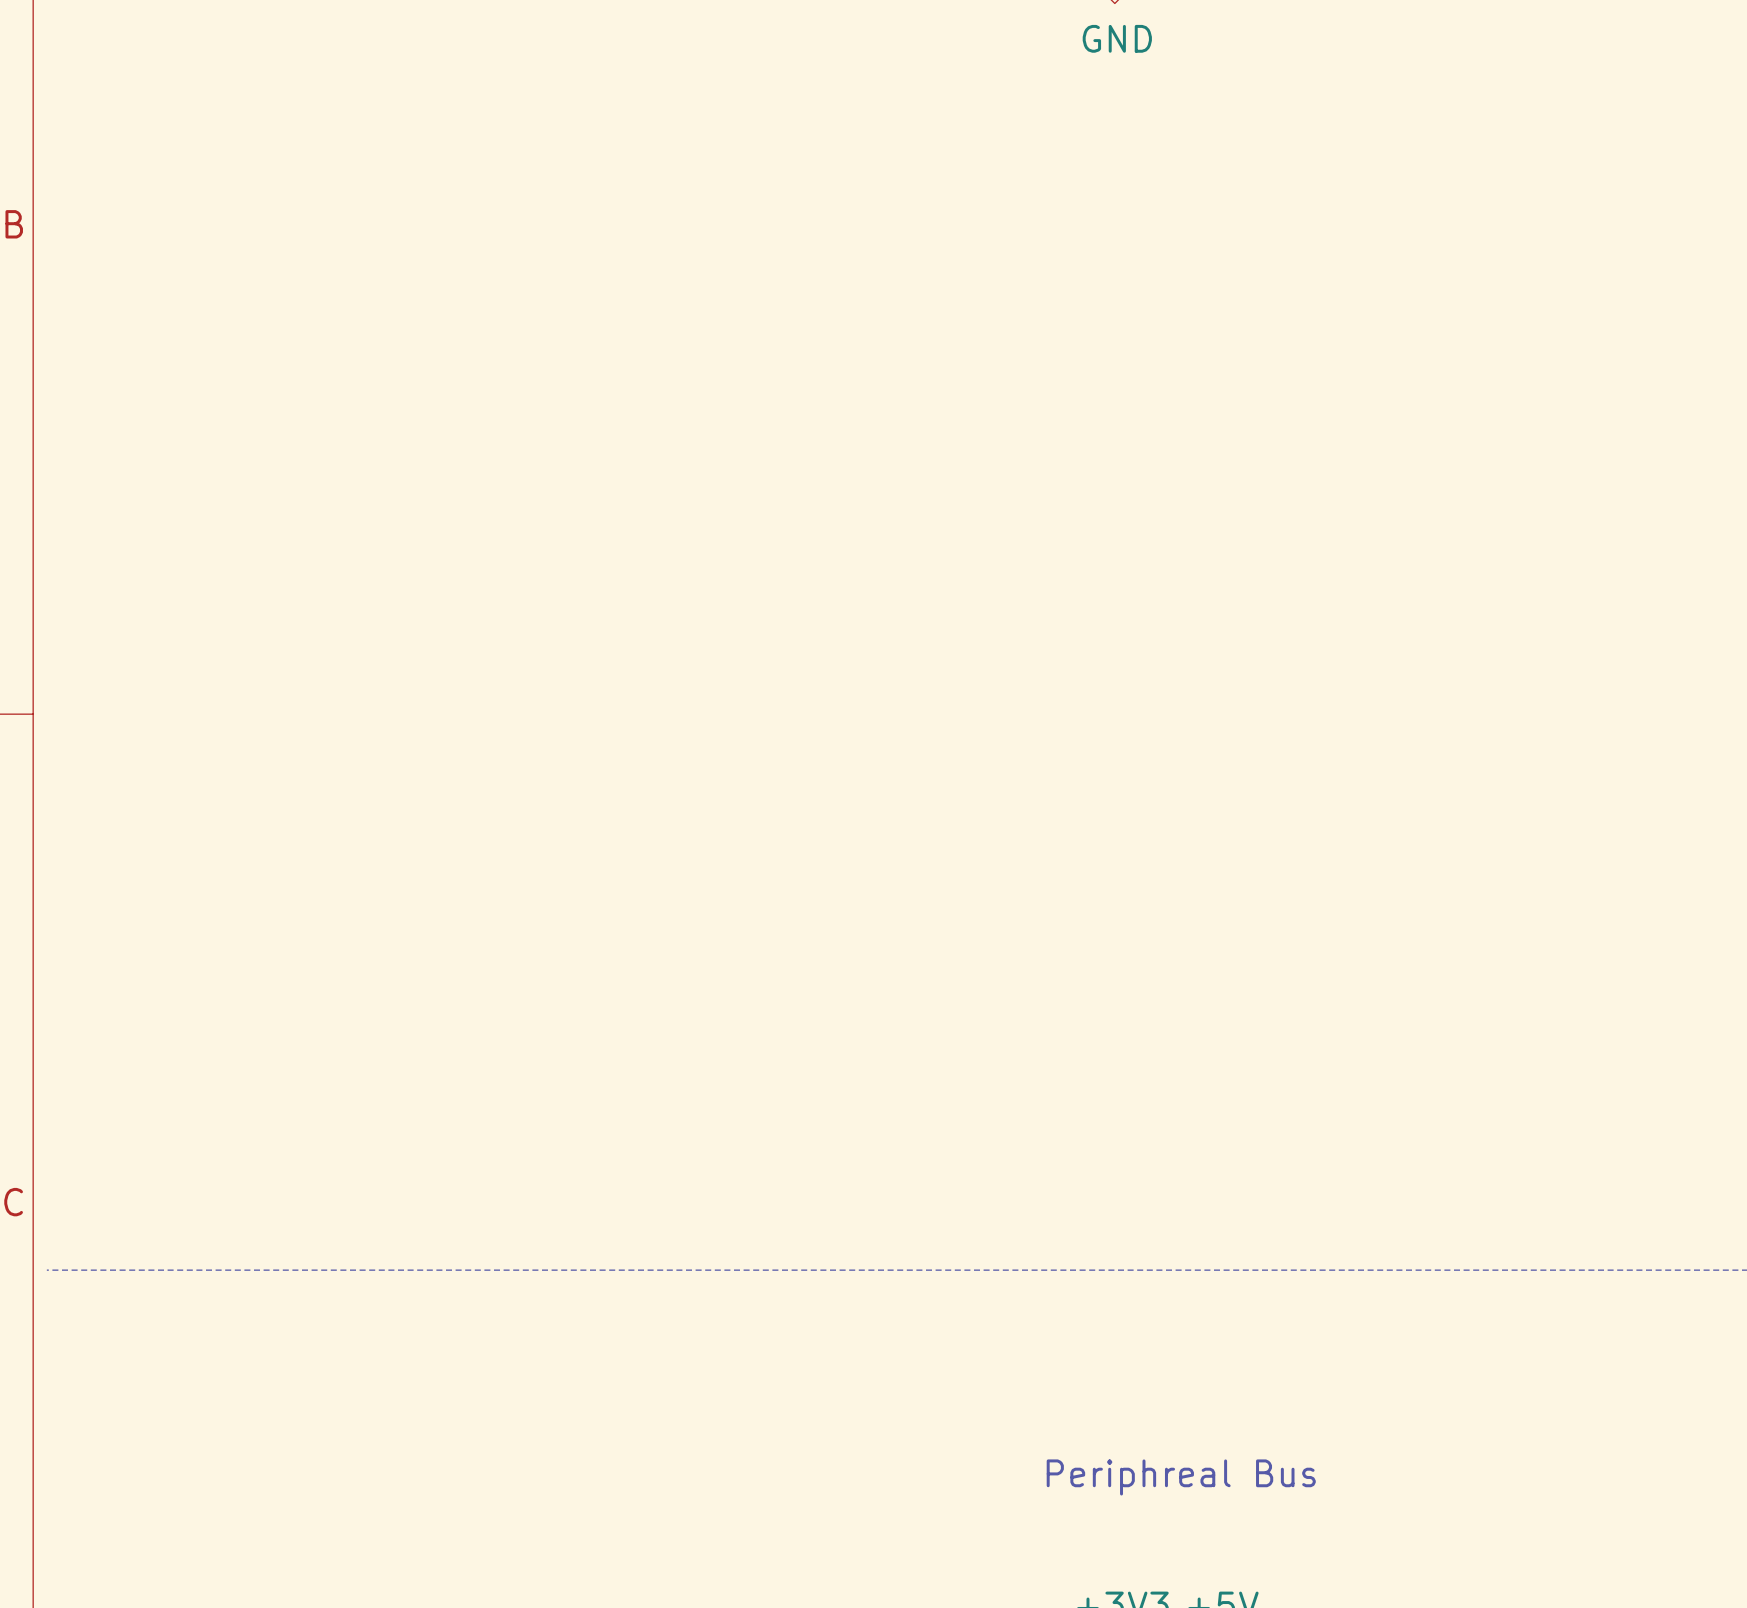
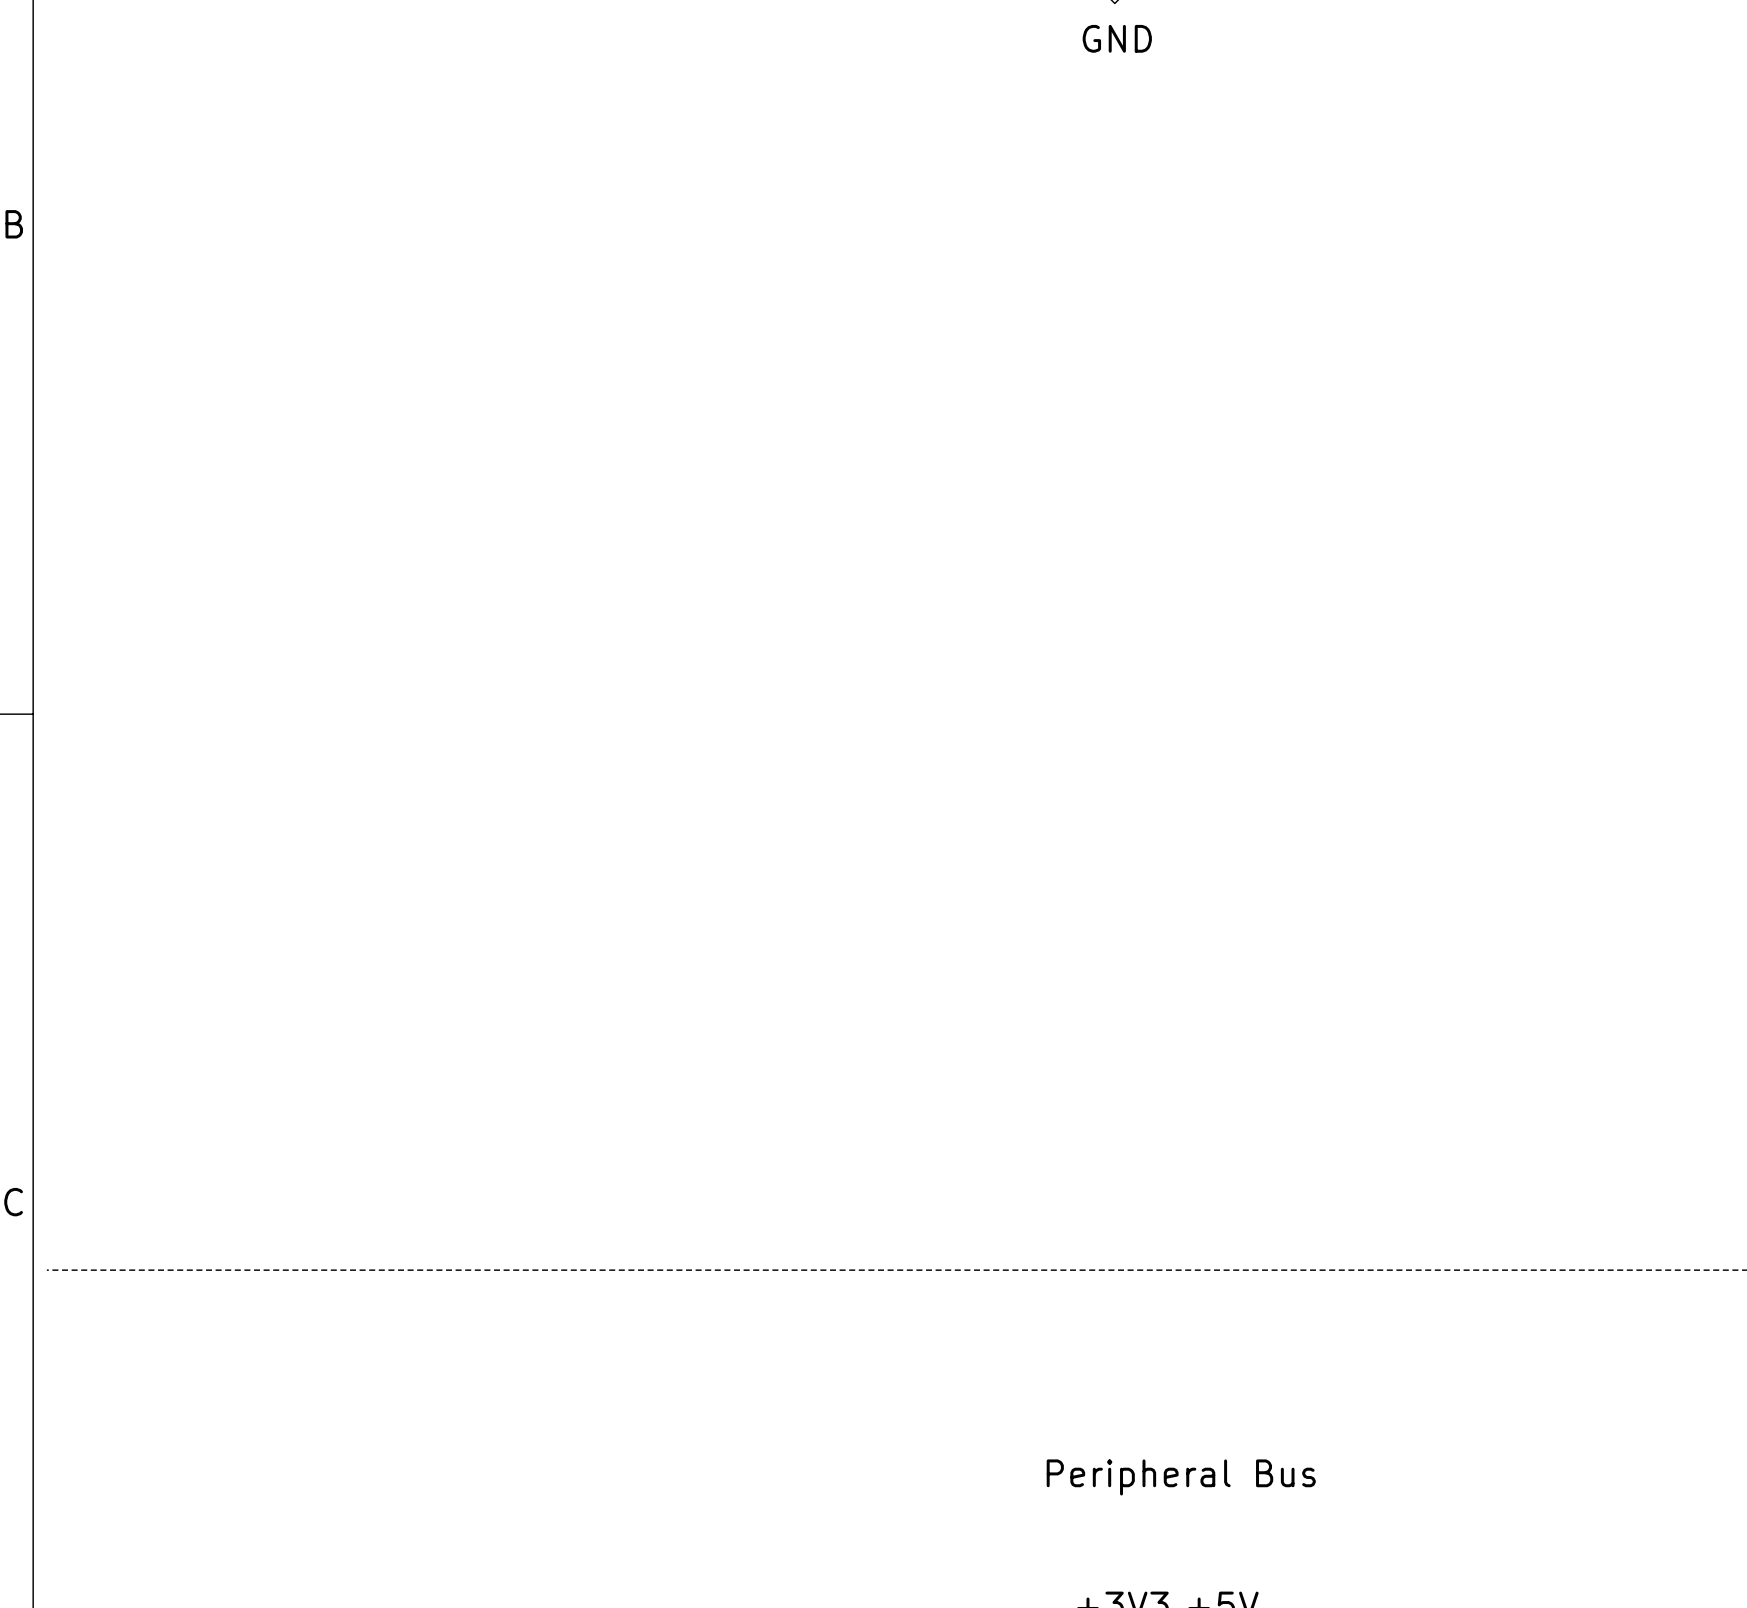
text: Periphreal Bus (1181, 1477) -> Peripheral Bus (1181, 1477)

